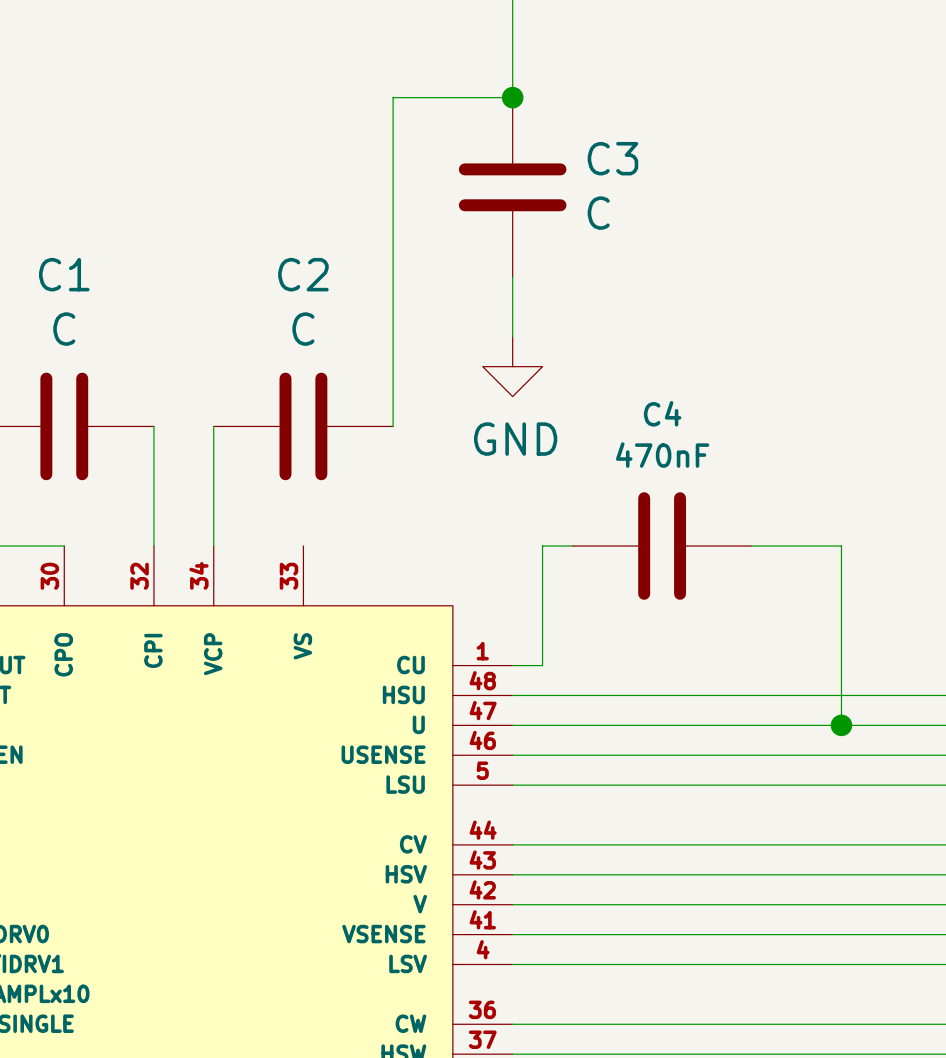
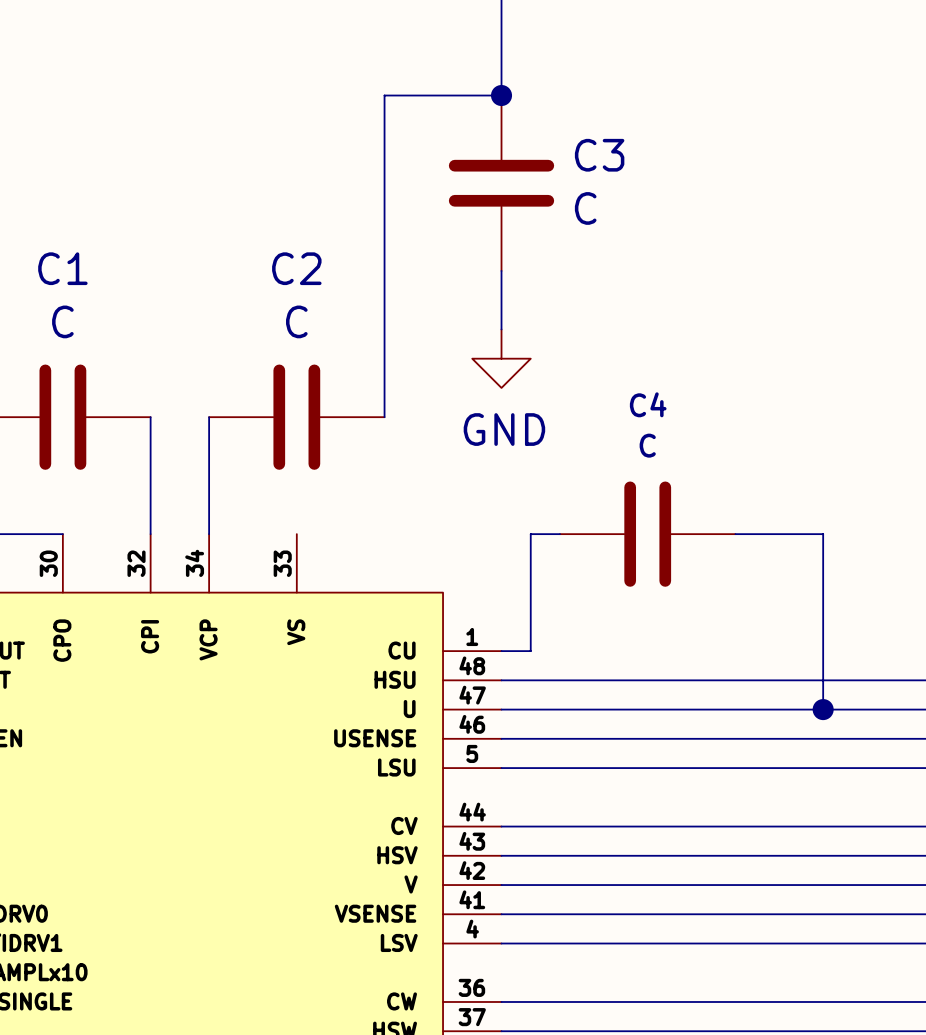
C4 value: 470nF (662, 455) -> C (647, 445)

